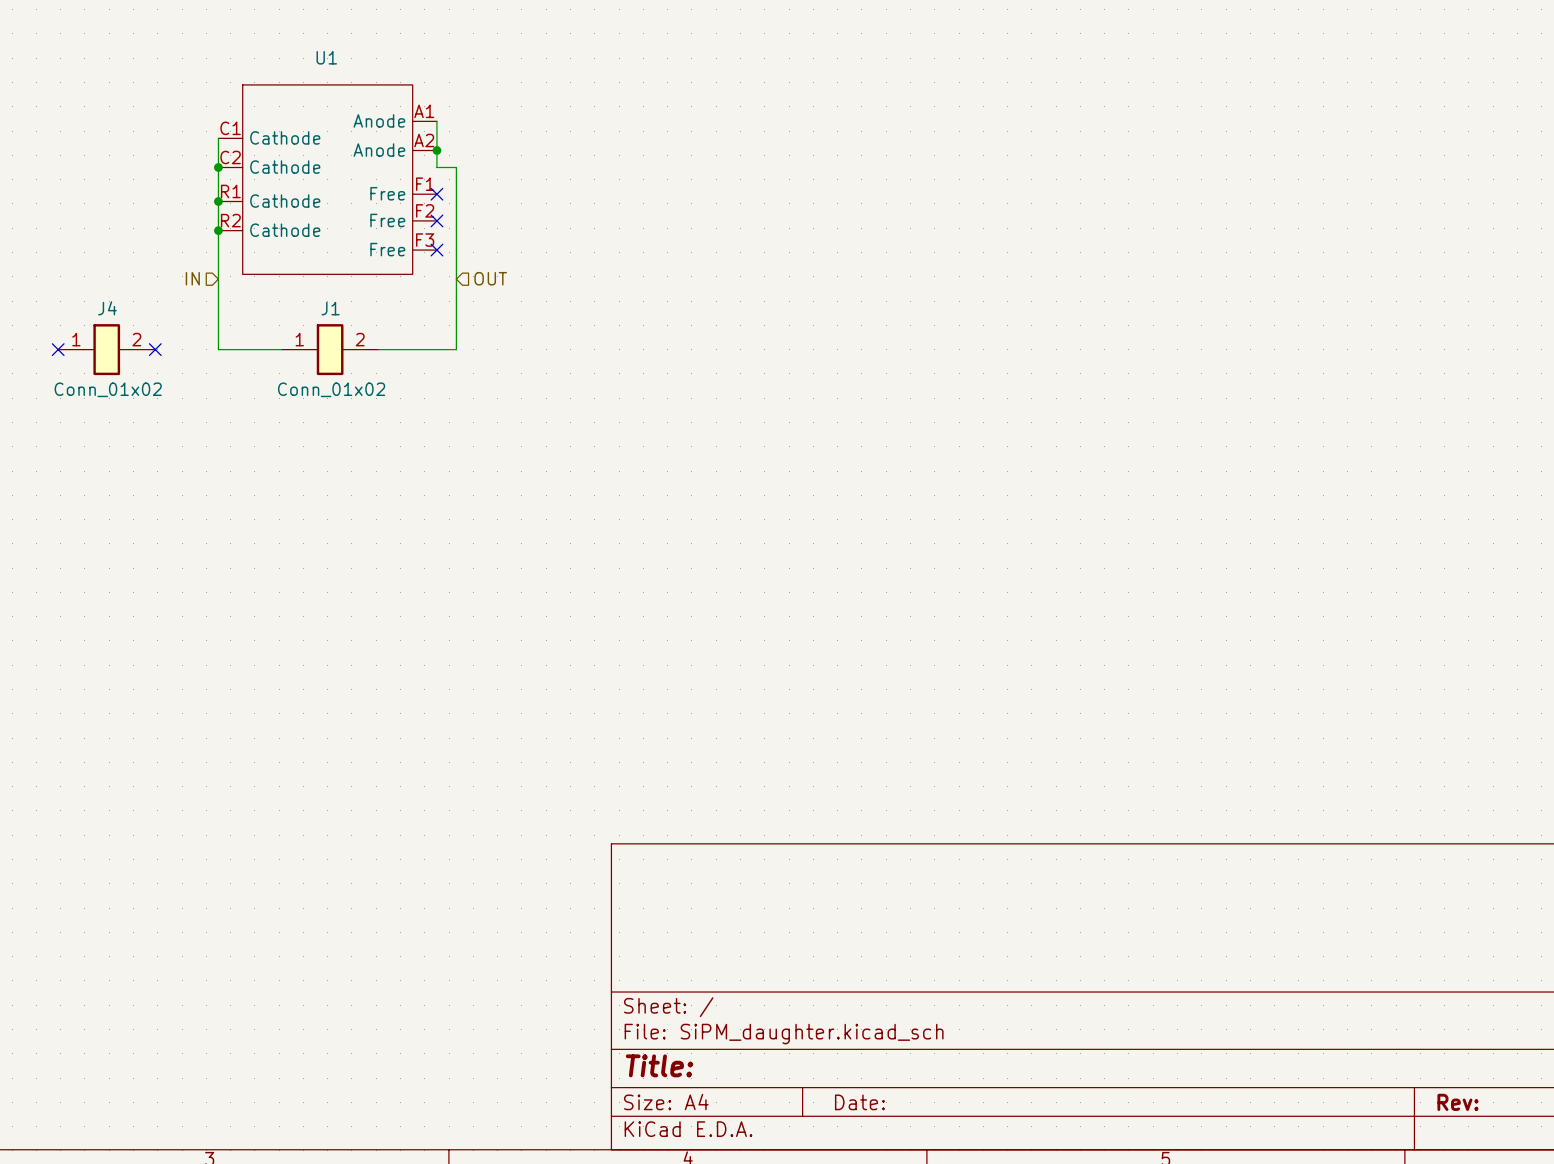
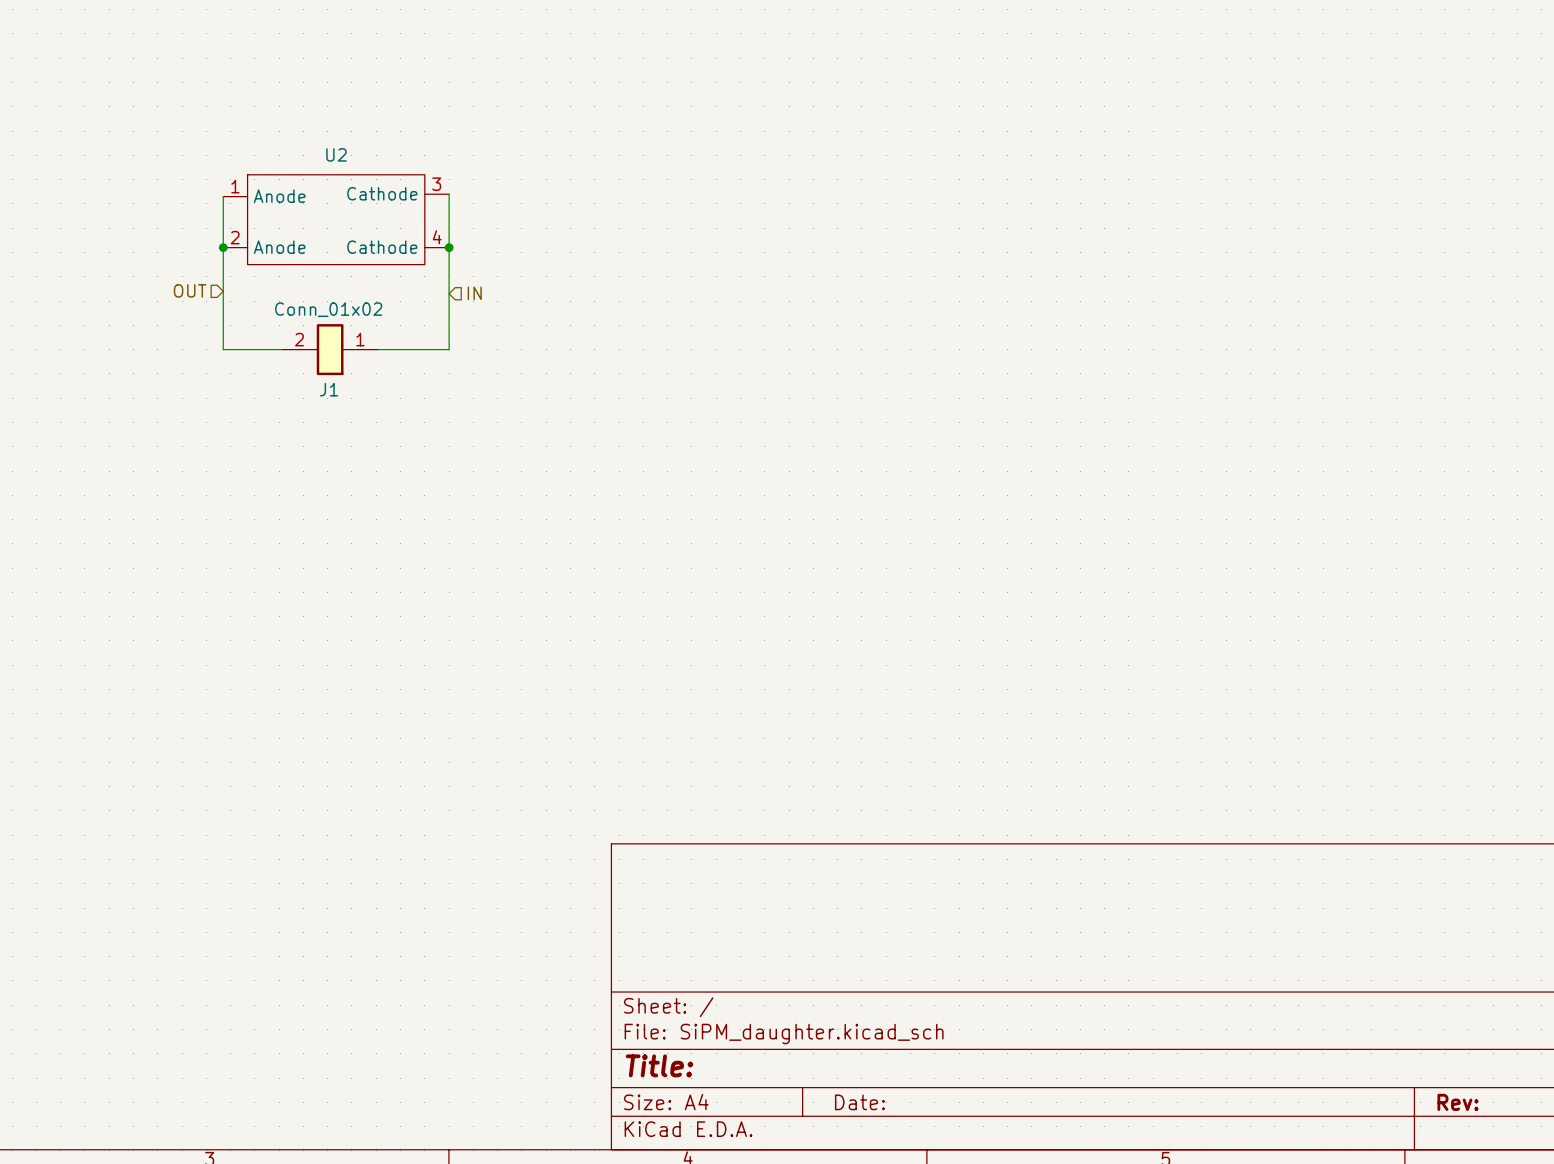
wire: (436, 121) (436, 167) (456, 167) (456, 349) (449, 349) -> (449, 194) (449, 349)
wire: (218, 138) (218, 349) (223, 349) -> (223, 196) (223, 349)
junction: (436, 150) -> none
junction: (218, 167) -> none
U1: (327, 179) -> none
no-connect mark: (436, 194) -> none
junction: (218, 201) -> none
U2: none -> (336, 219)
no-connect mark: (436, 220) -> none
junction position: (218, 230) -> (223, 247)
junction: none -> (449, 247)
no-connect mark: (436, 250) -> none
hierarchical label: IN (192, 278) -> none
hierarchical label: OUT (490, 278) -> none
hierarchical label: none -> OUT (190, 290)
hierarchical label: none -> IN (474, 293)
no-connect mark: (58, 349) -> none
J4: Conn_01x02 (106, 349) -> none
no-connect mark: (155, 349) -> none
J1 rotation: 0° (330, 349) -> 180° (330, 349)

